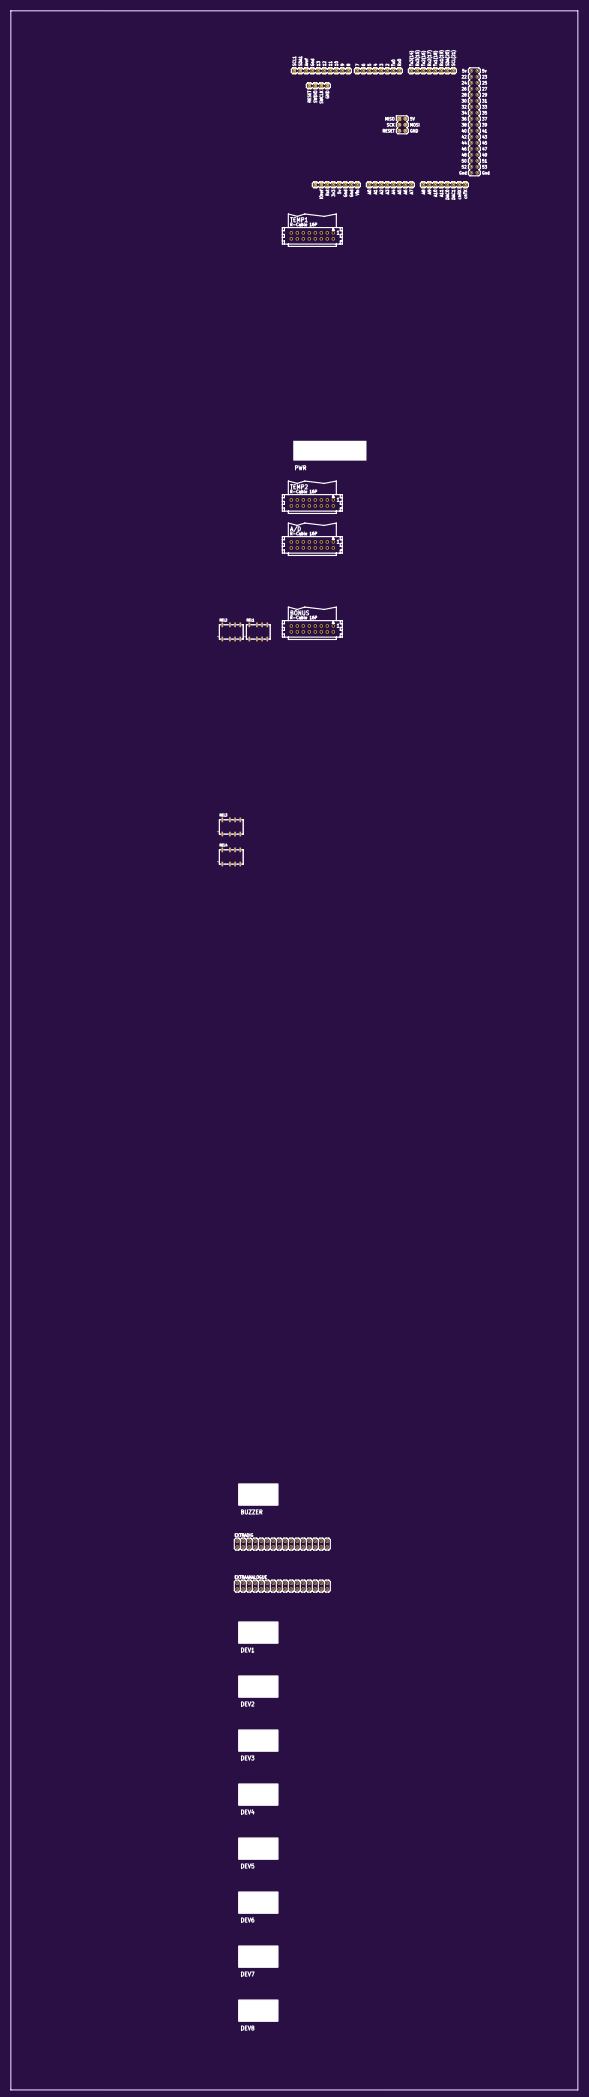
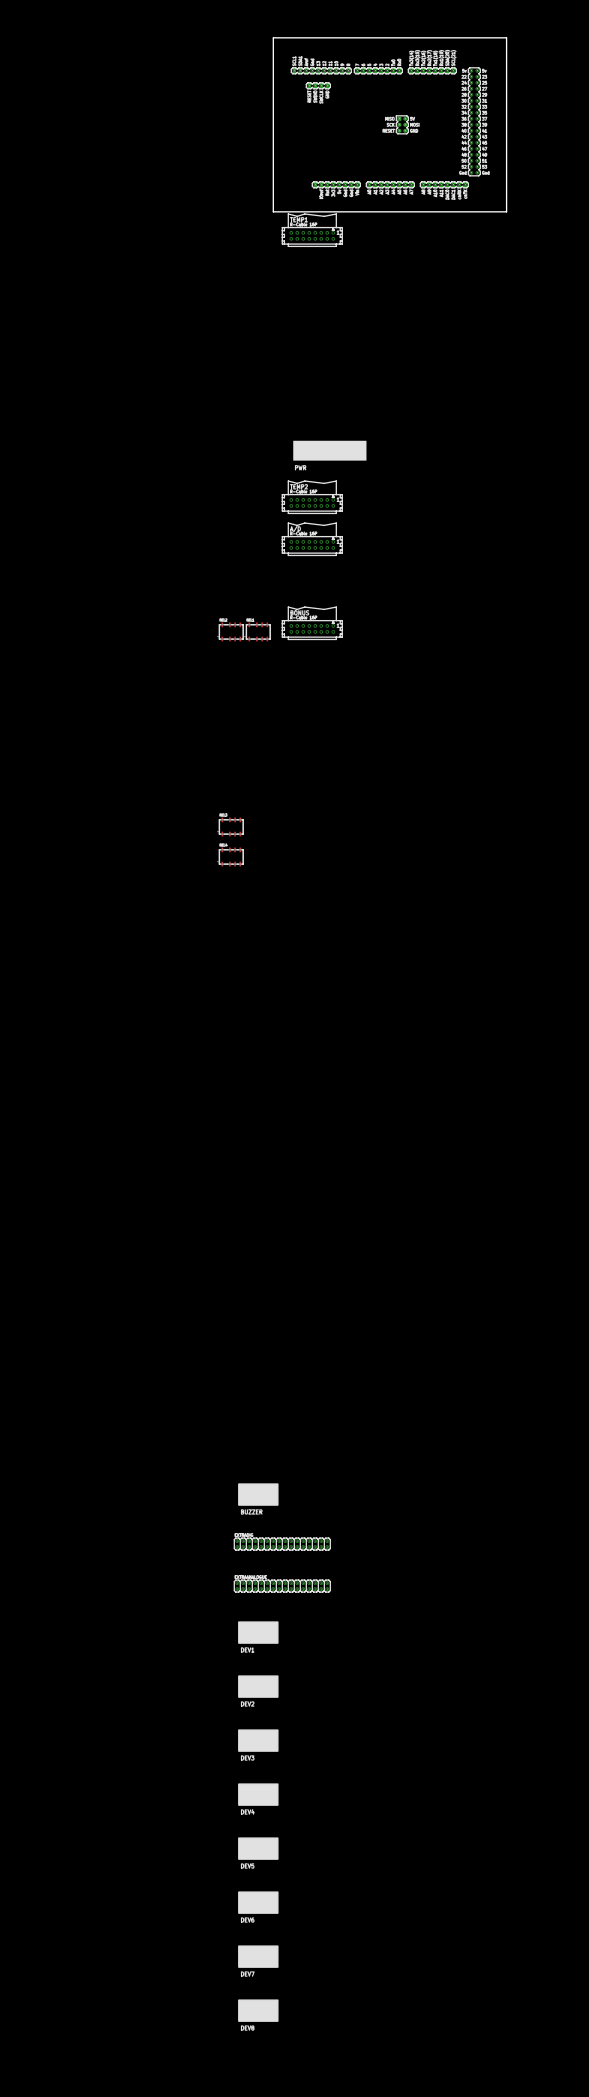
board edge: (10, 10) (577, 10) (577, 2089) (10, 2089) (10, 10) -> none
board edge: none -> (273, 37) (506, 37) (506, 211) (273, 211) (273, 37)

